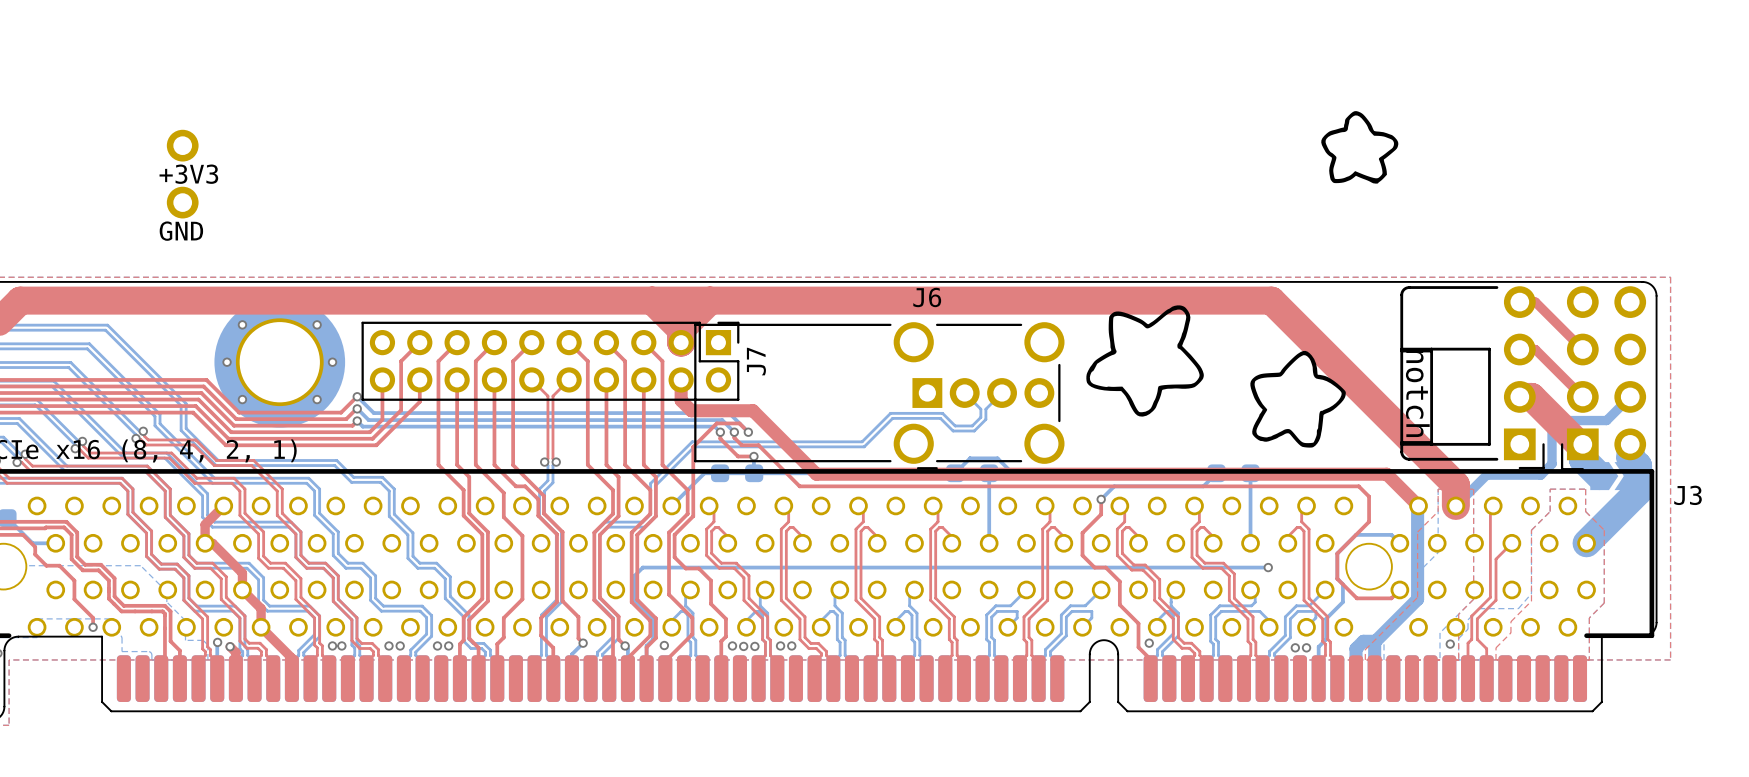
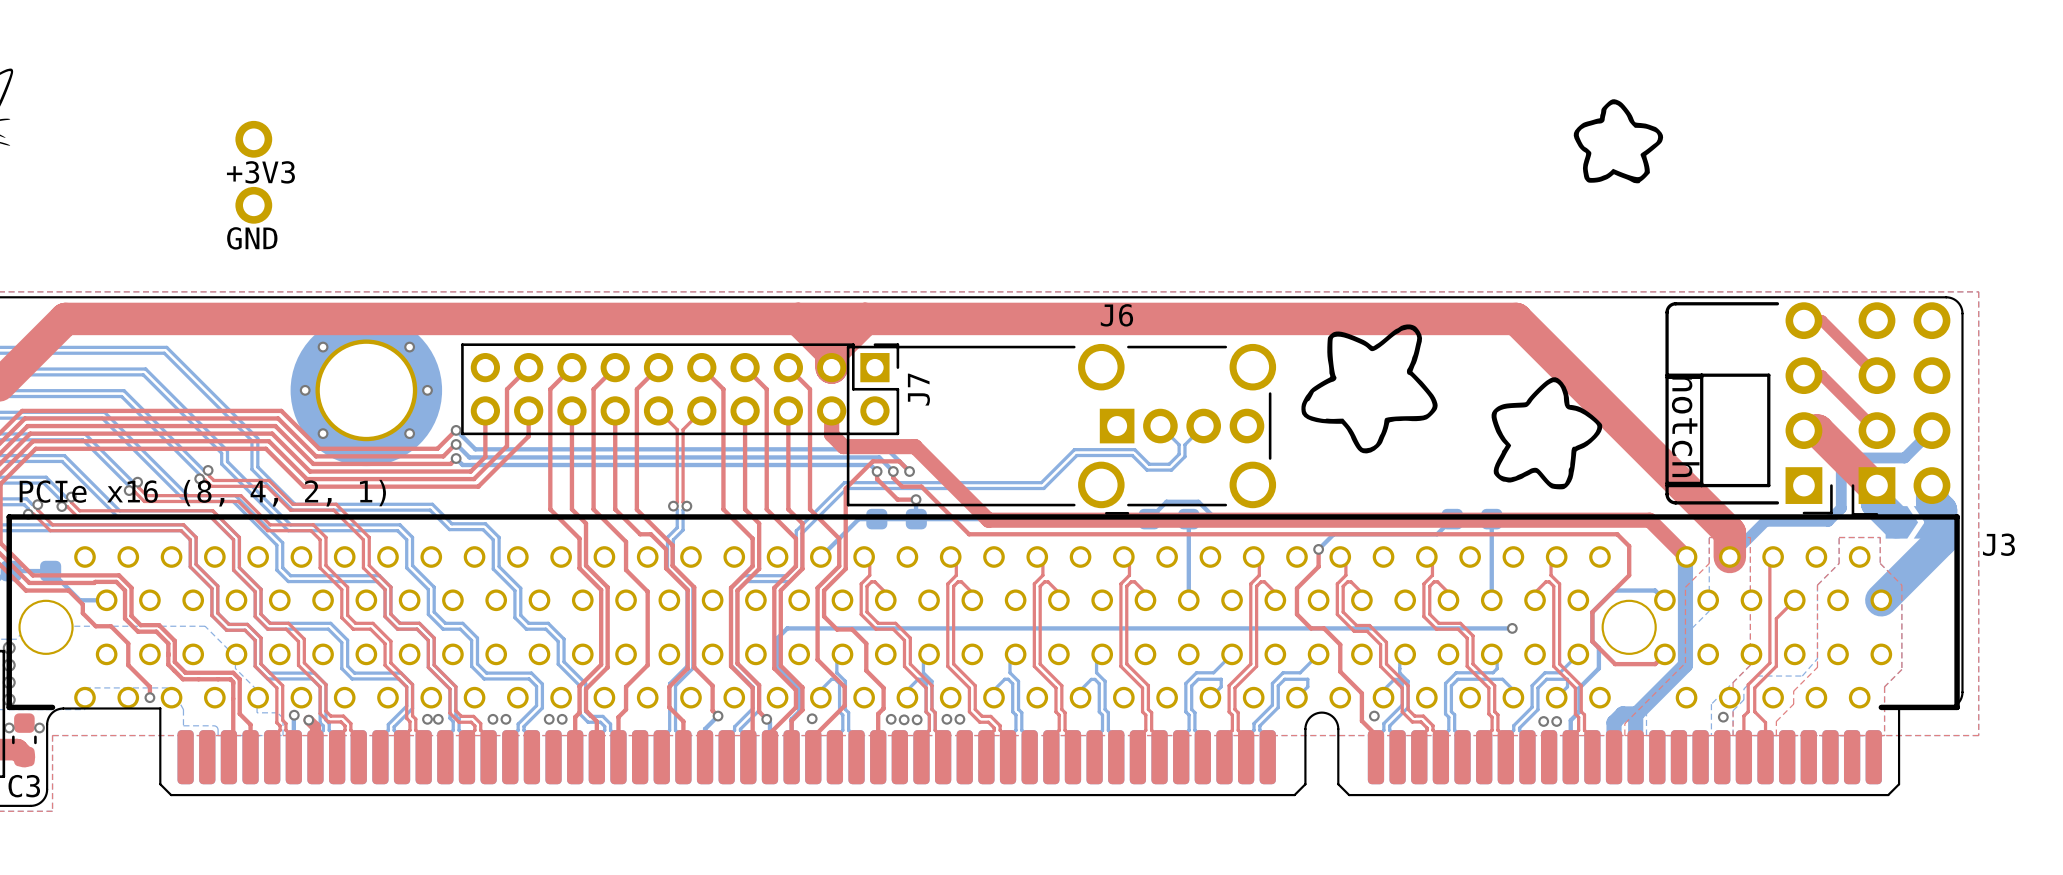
top track: (223, 505) (205, 524) (205, 543) (212, 543) (242, 573) (242, 589) (261, 608) (261, 627) (291, 658) (291, 678) -> none

